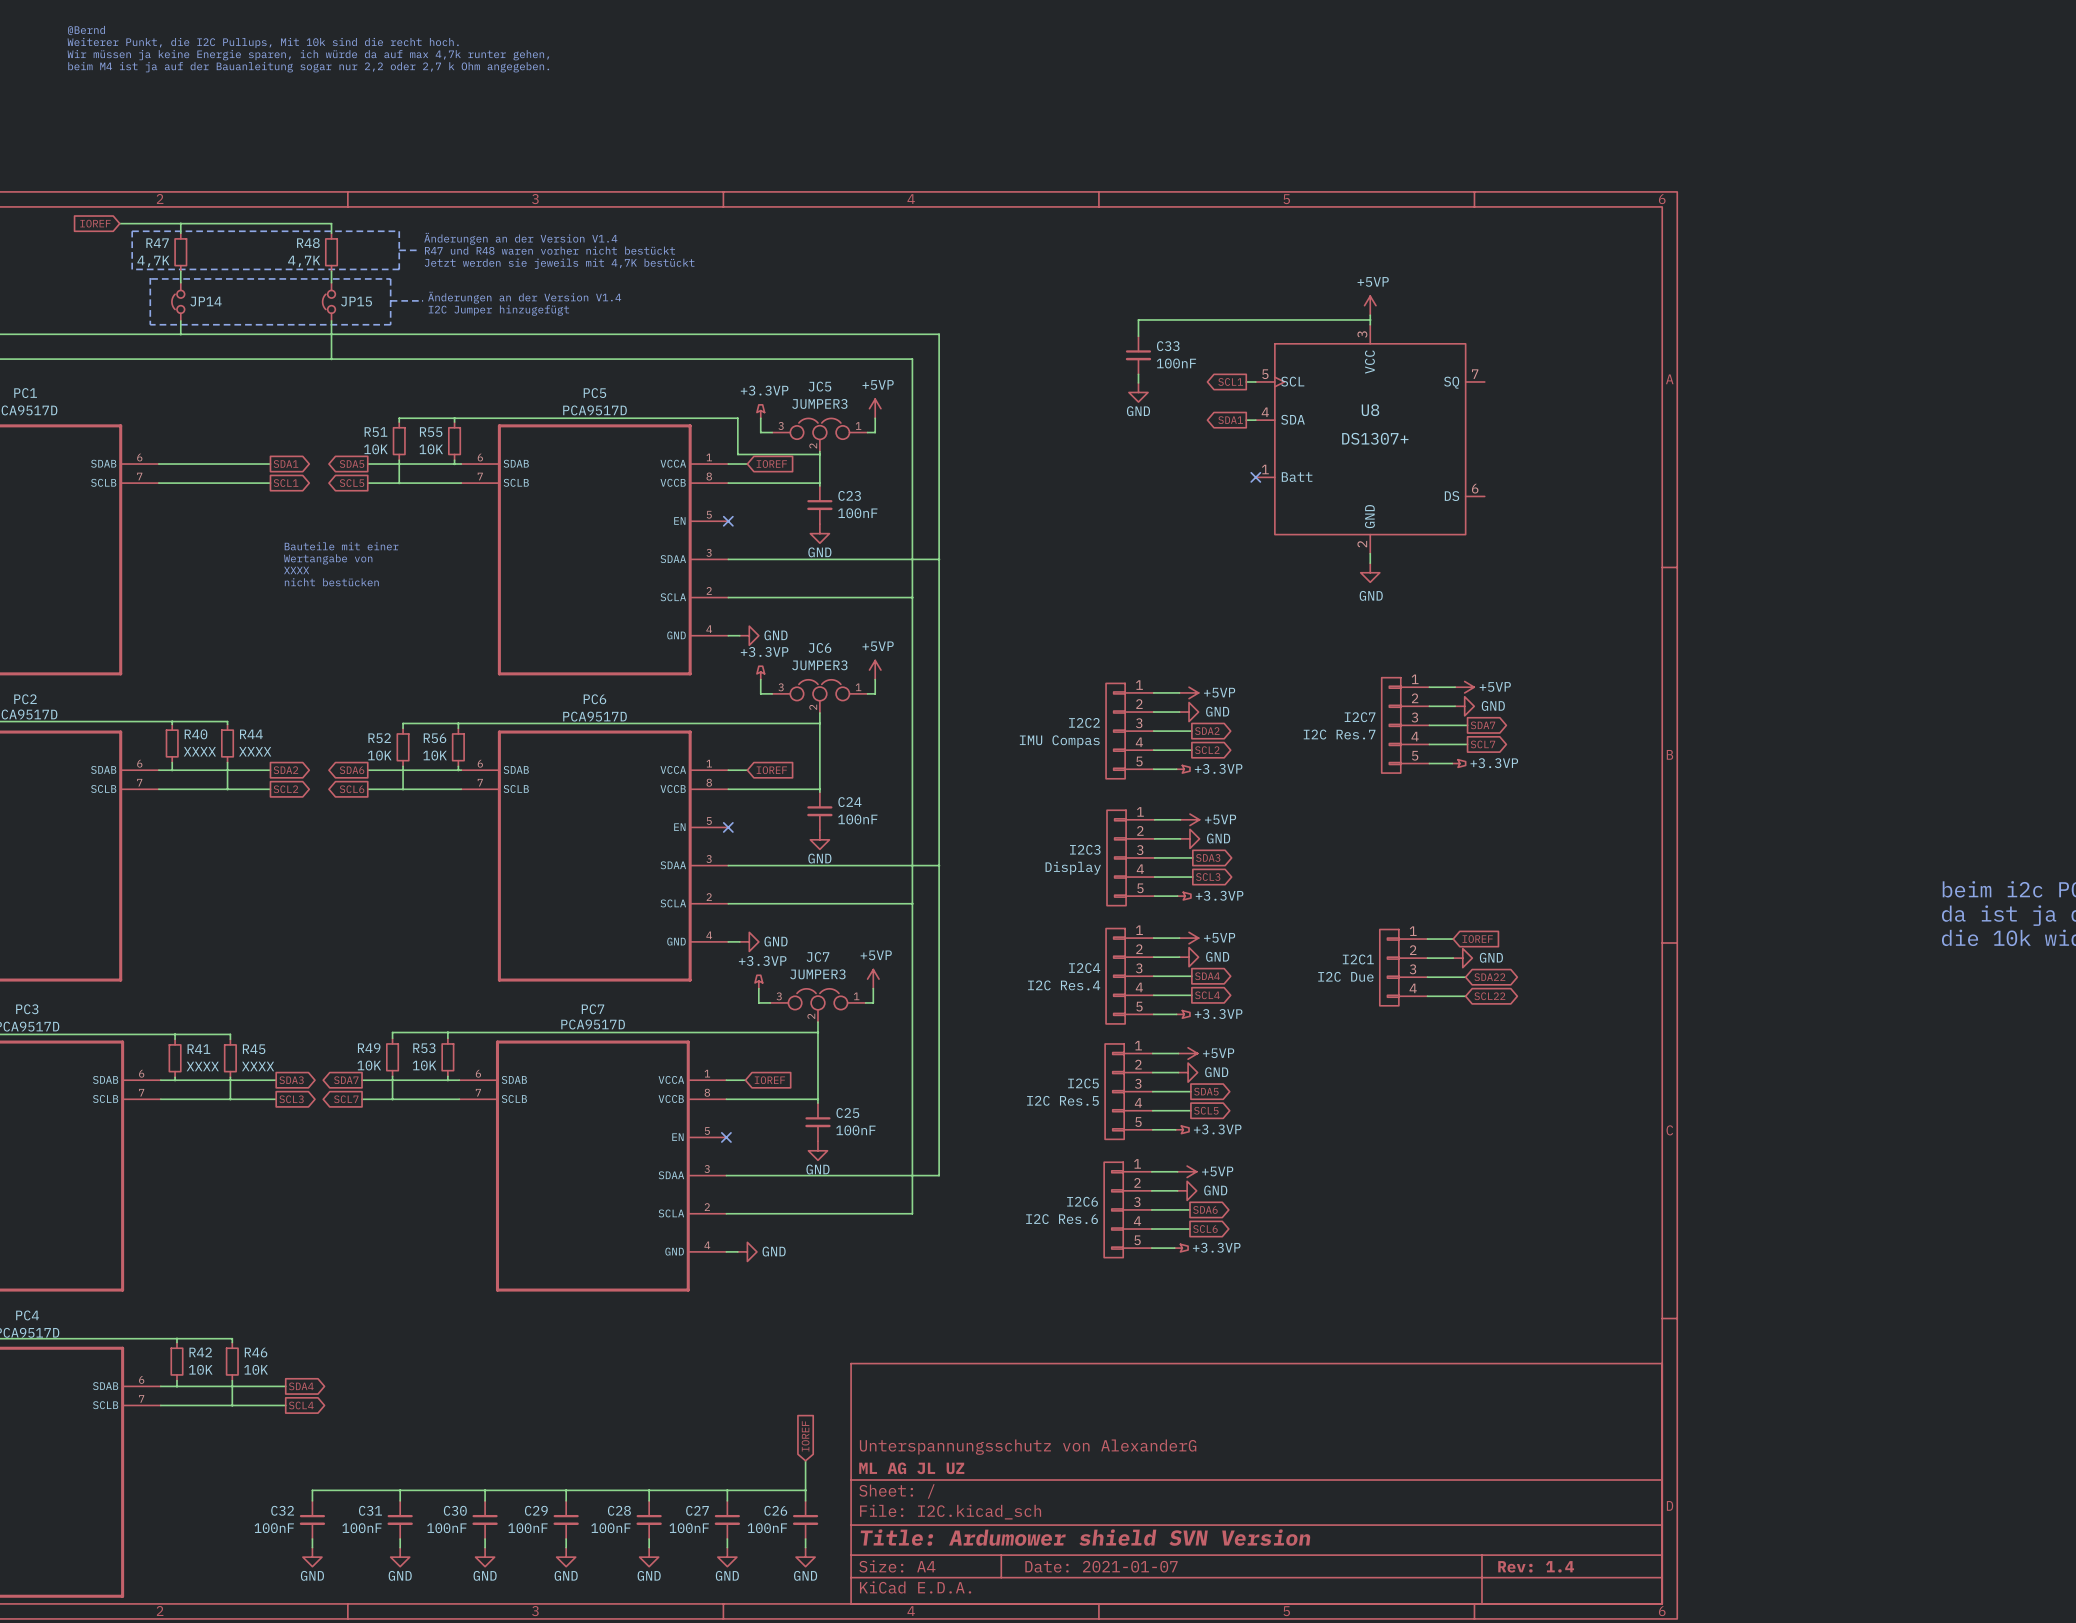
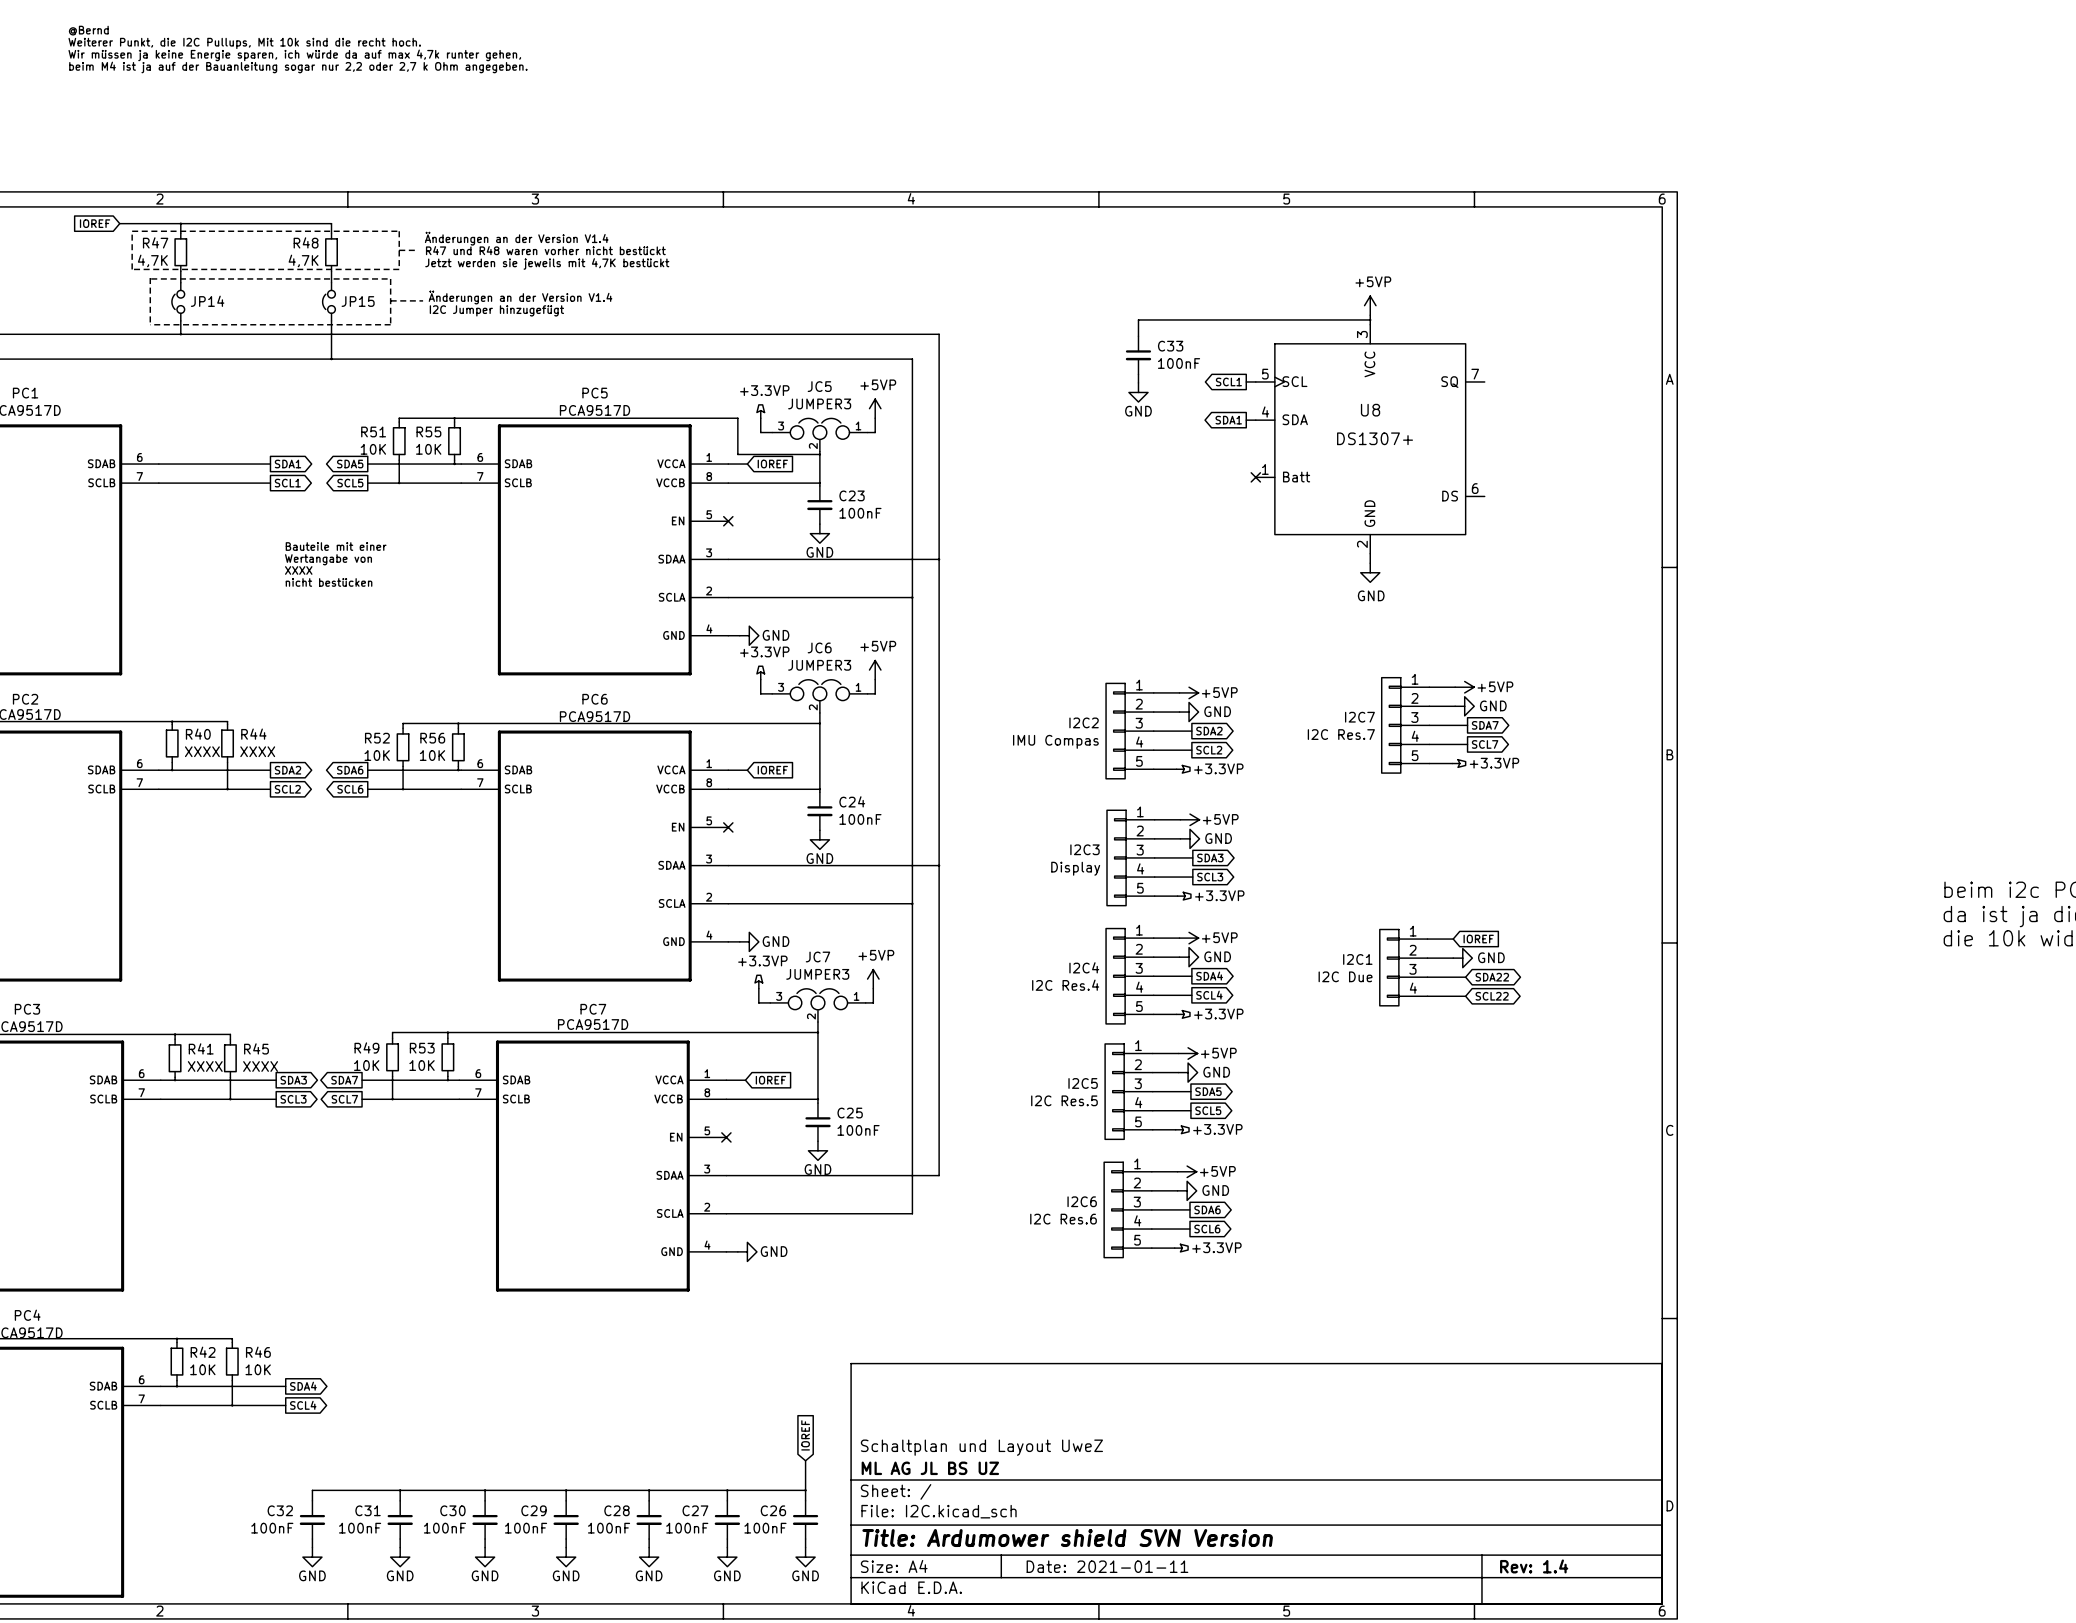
title block: Unterspannungsschutz von AlexanderG (1028, 1447) -> Schaltplan und Layout UweZ (981, 1447)
title block: ML AG JL UZ (911, 1468) -> ML AG JL BS UZ (930, 1468)
title block: Date: 2021-01-07 (1101, 1566) -> Date: 2021-01-11 (1107, 1566)

